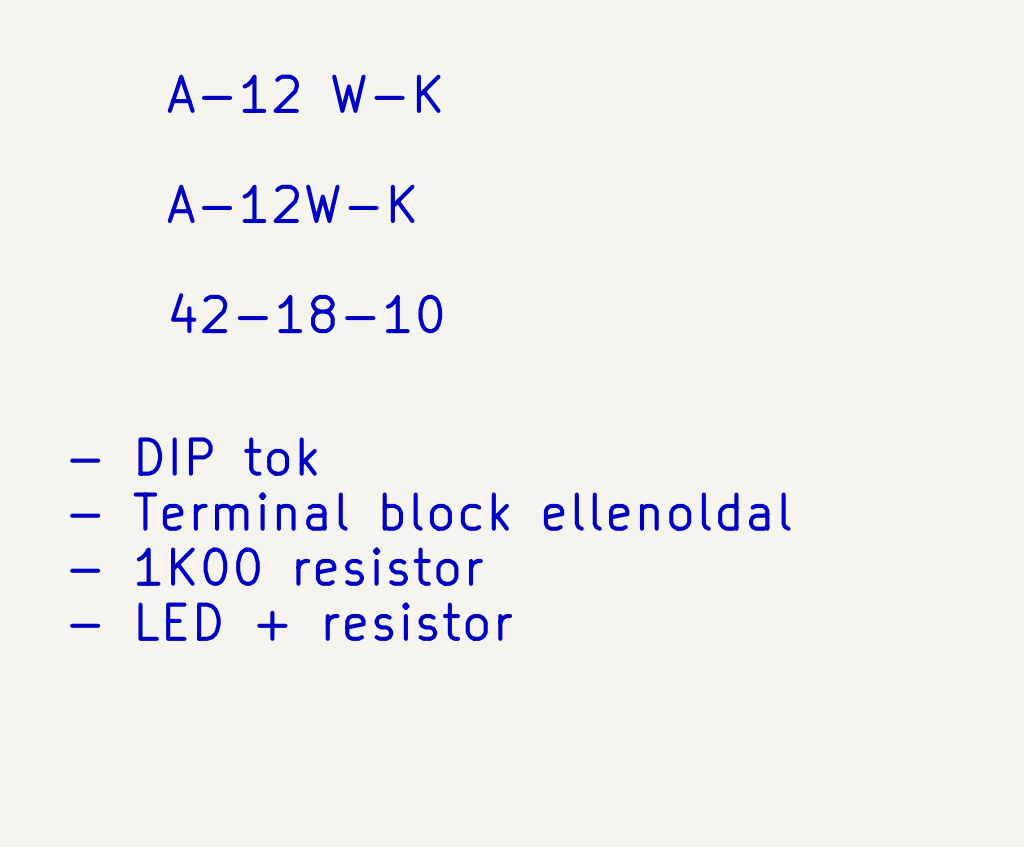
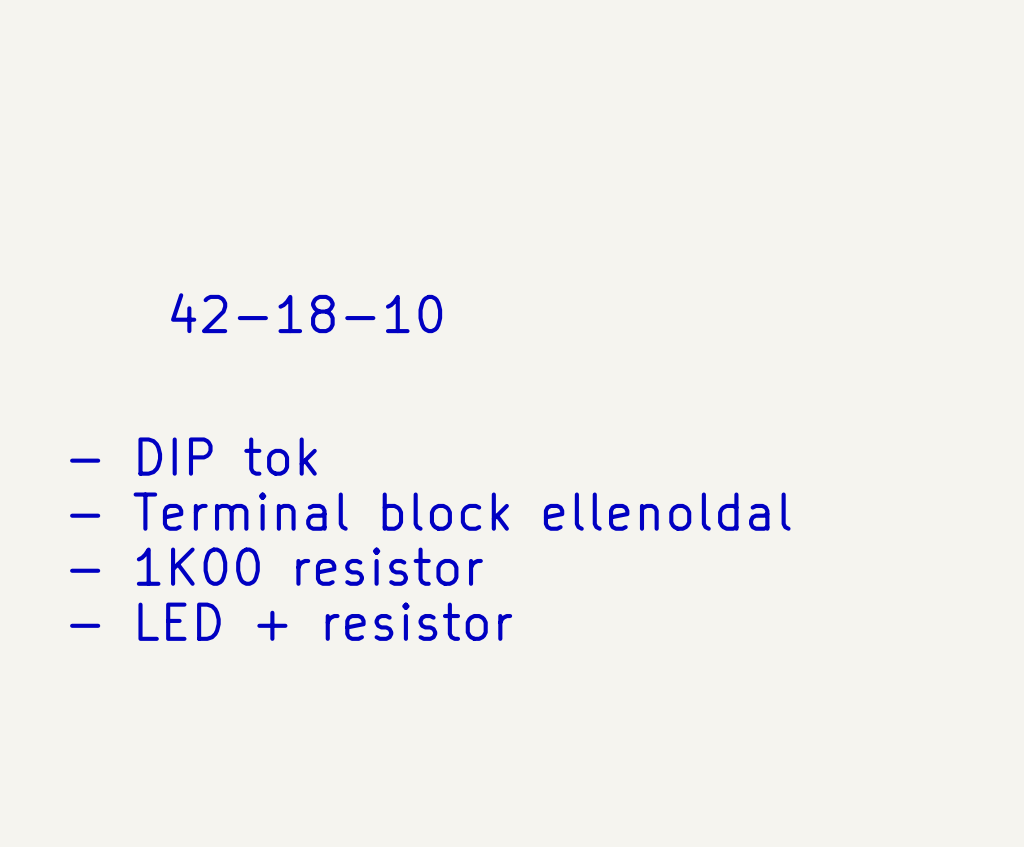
text: A-12 W-K (304, 93) -> none
text: A-12W-K (291, 203) -> none

